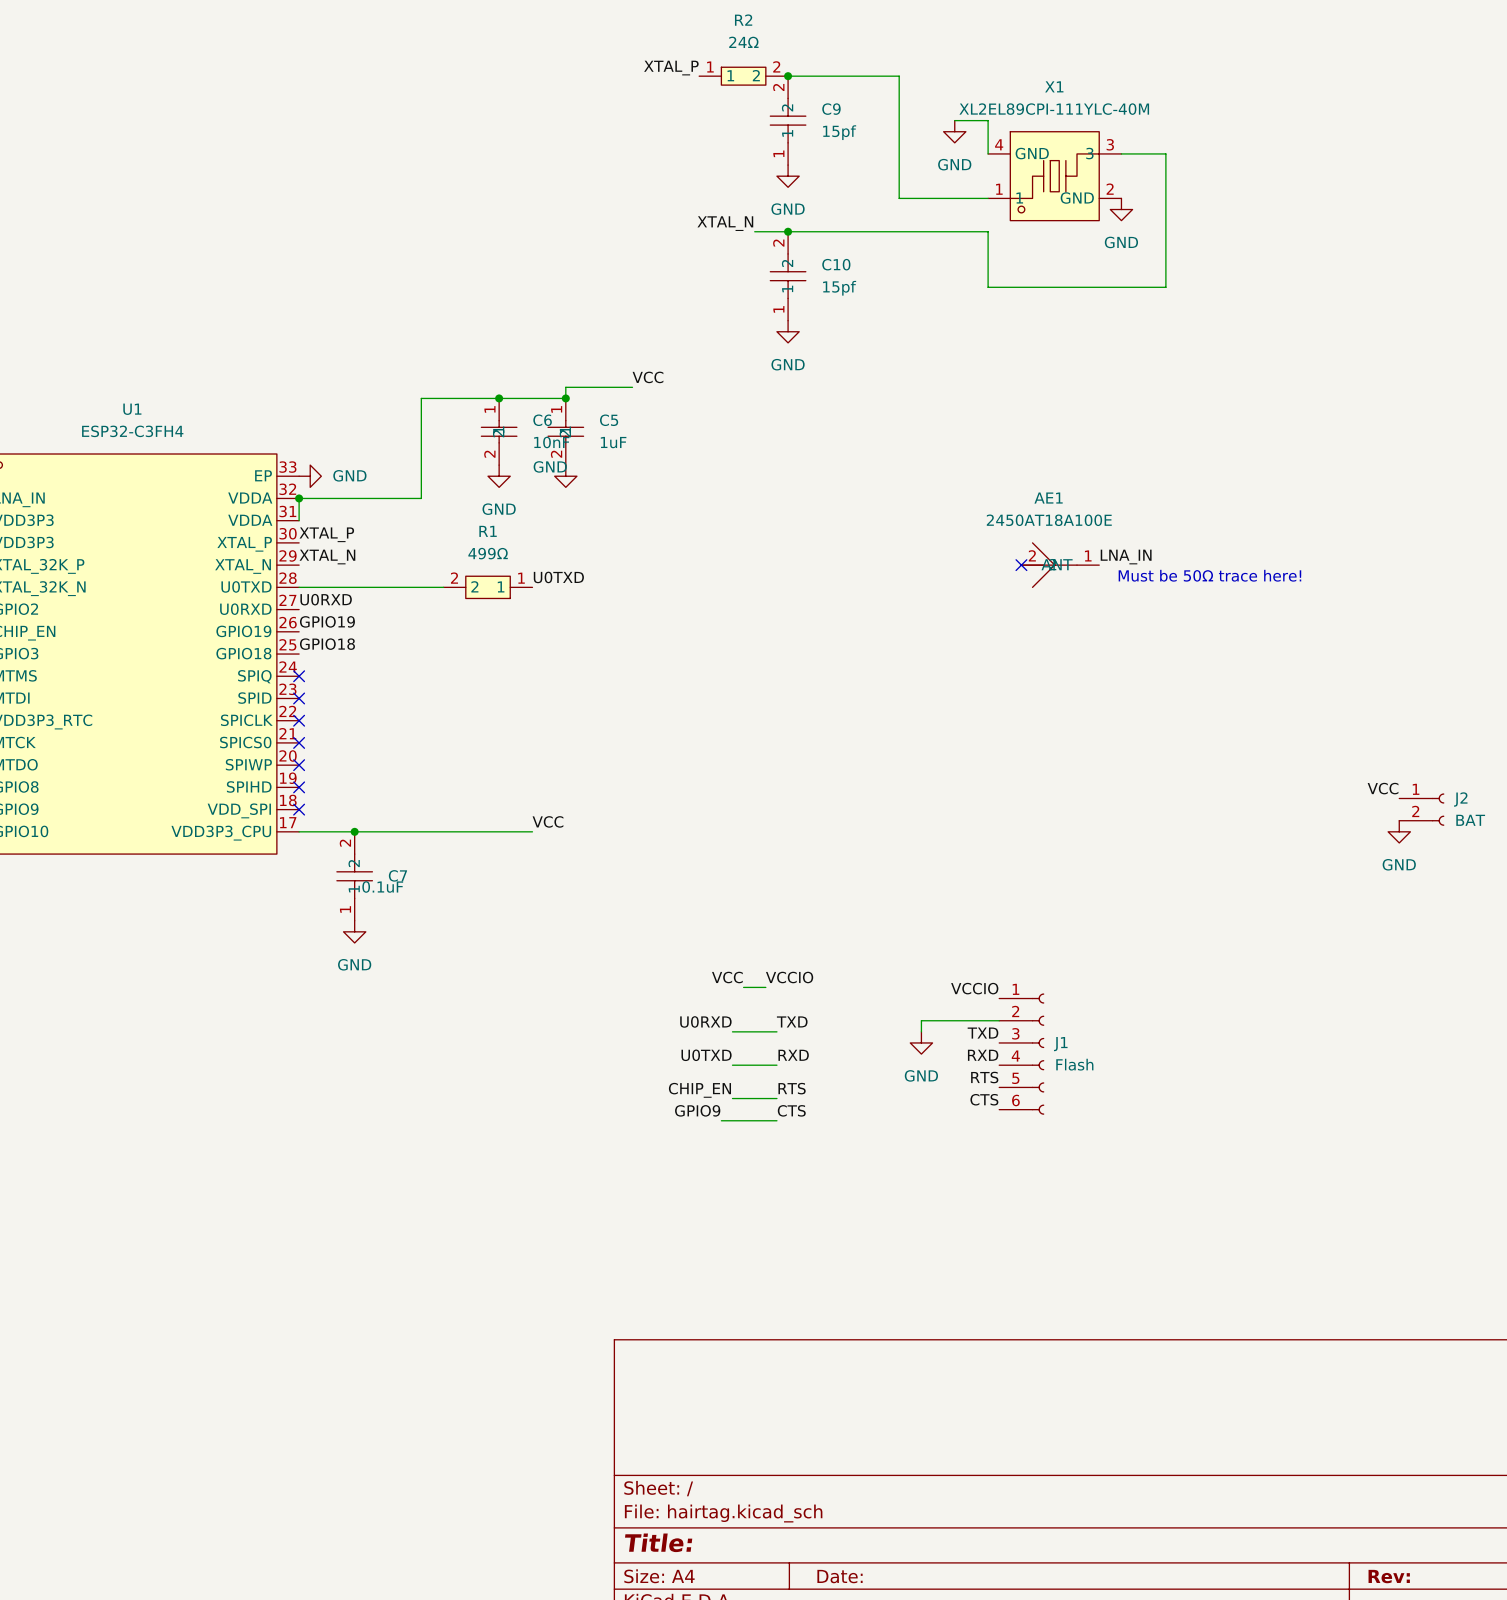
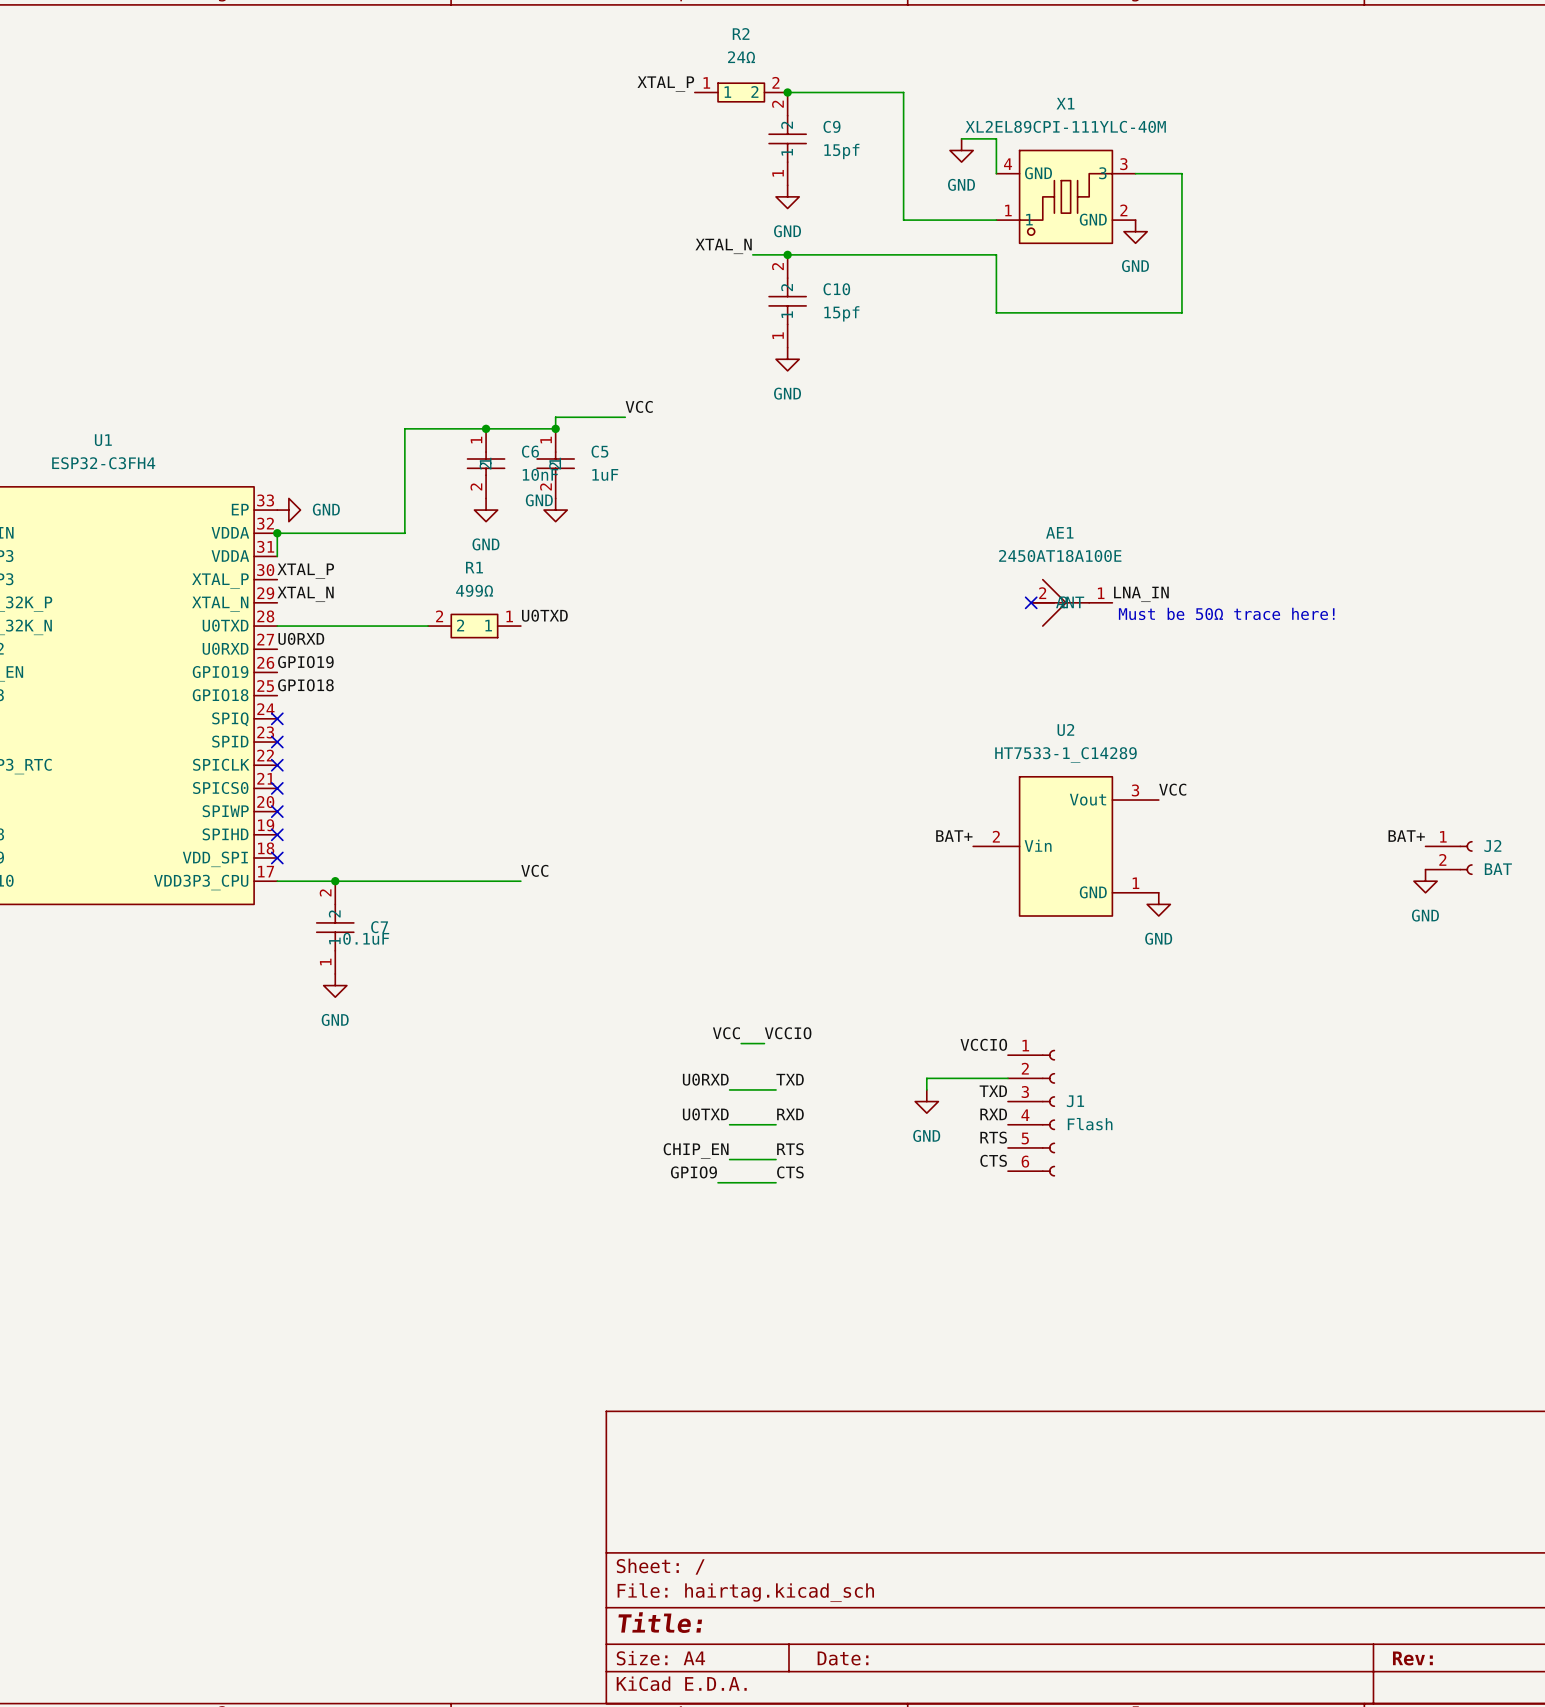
label: none -> VCC (1172, 789)
label: none -> BAT+ (954, 836)
label: VCC (1383, 788) -> BAT+ (1406, 836)
U2: none -> HT7533-1_C14289 (1065, 846)
power symbol: none -> GND (1158, 904)

